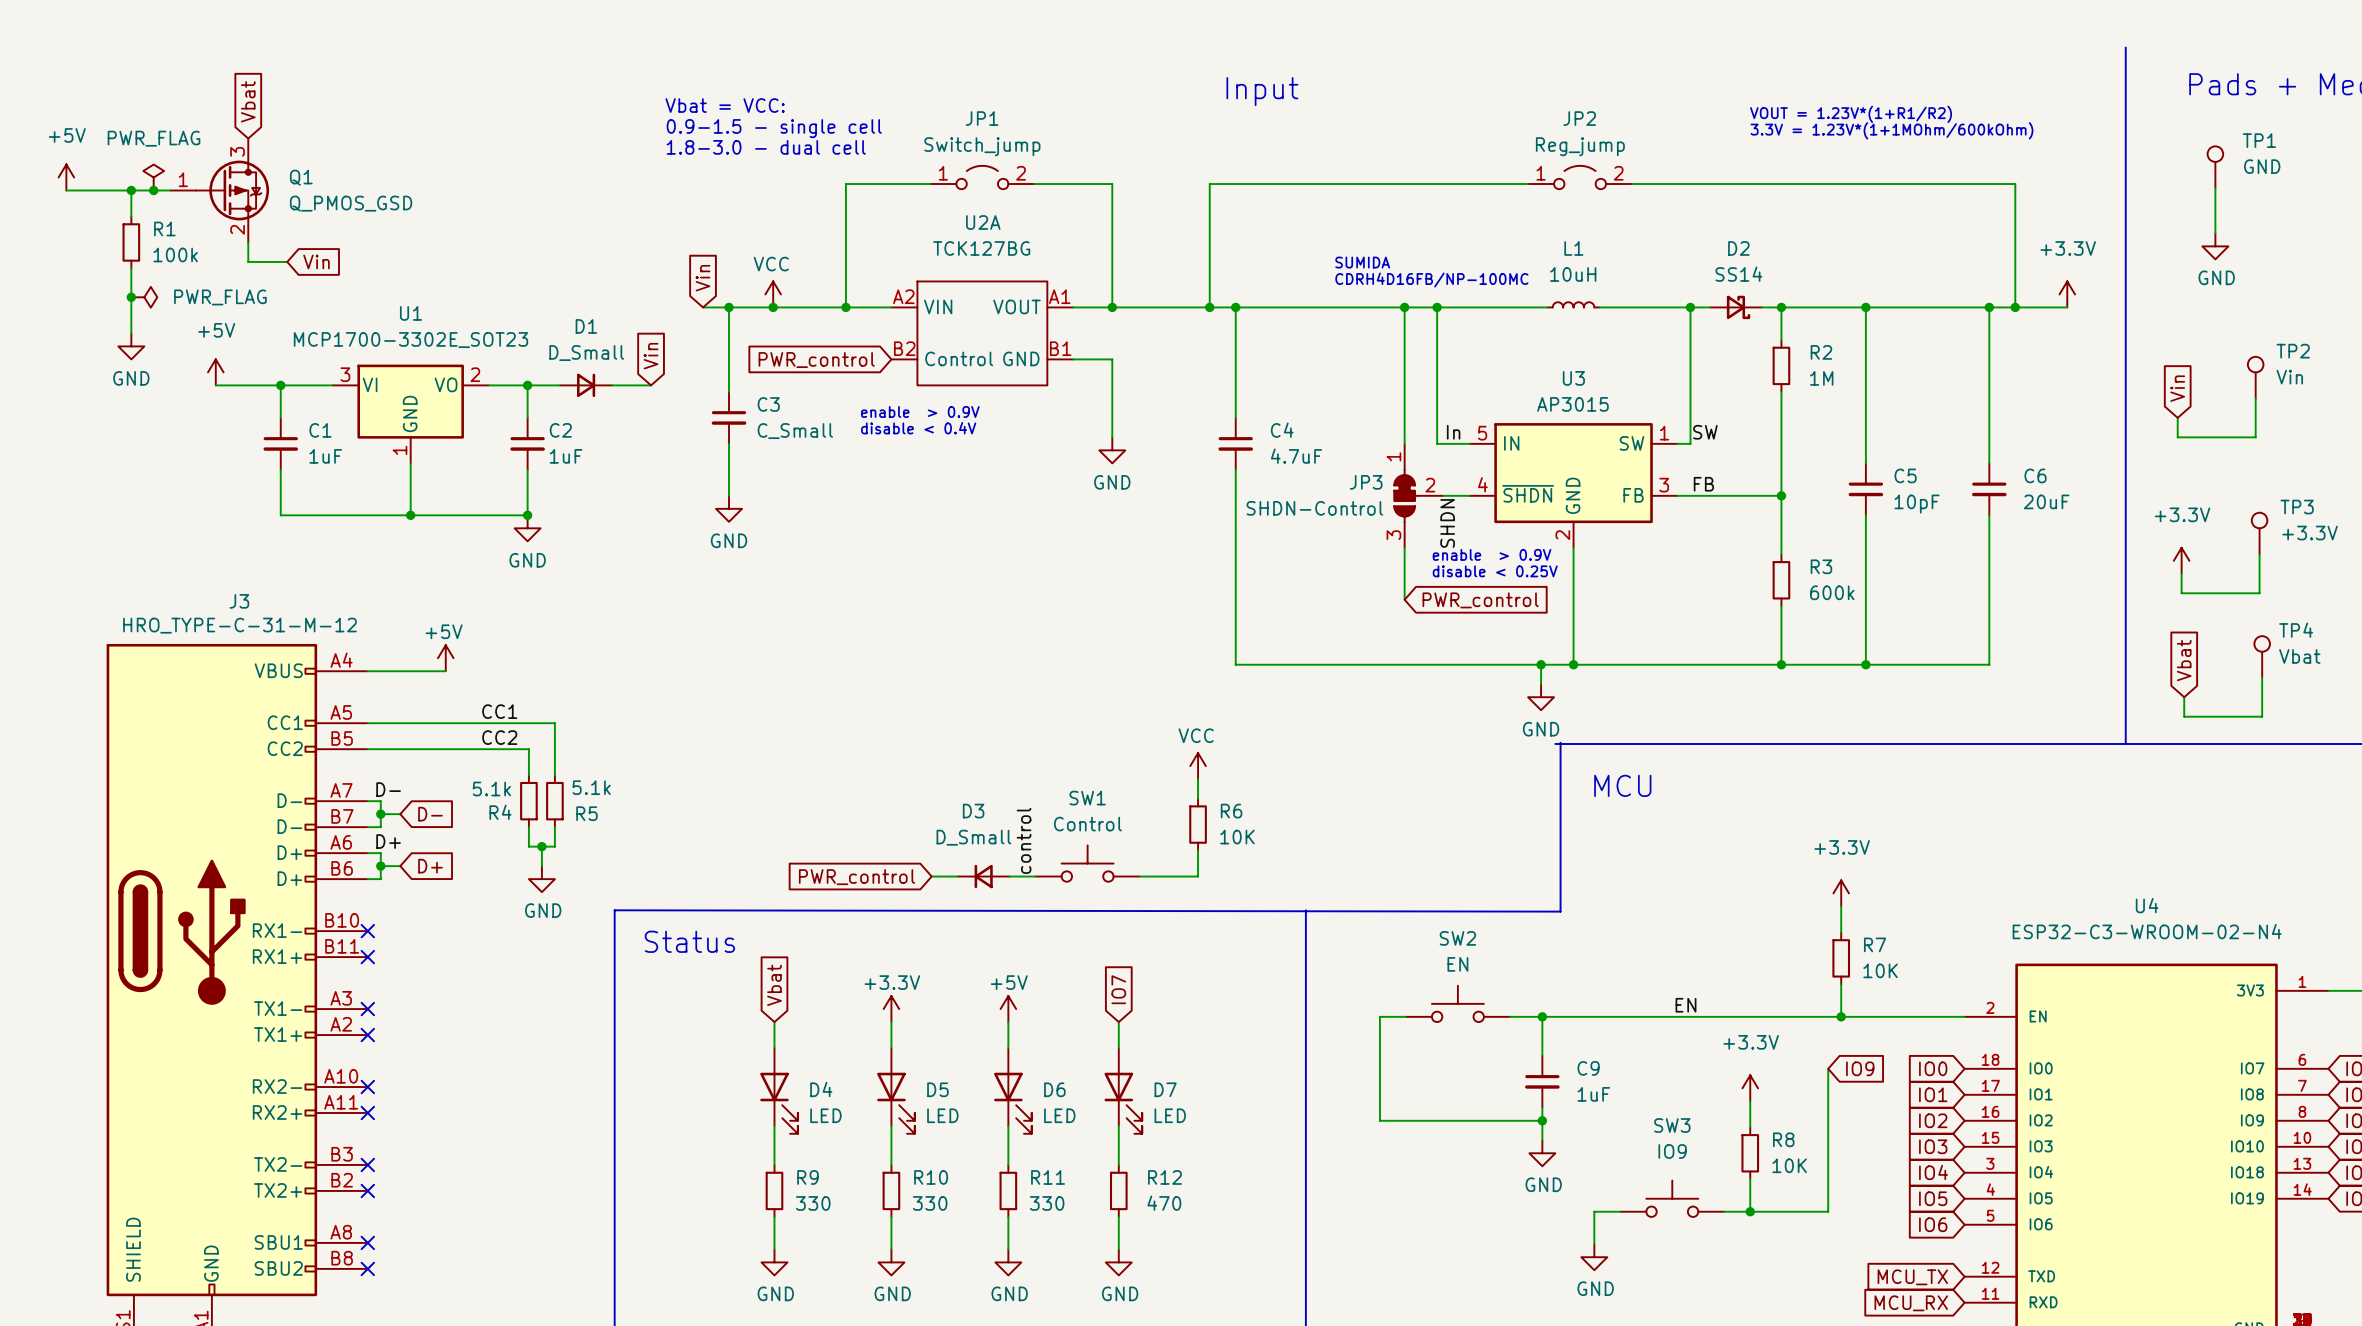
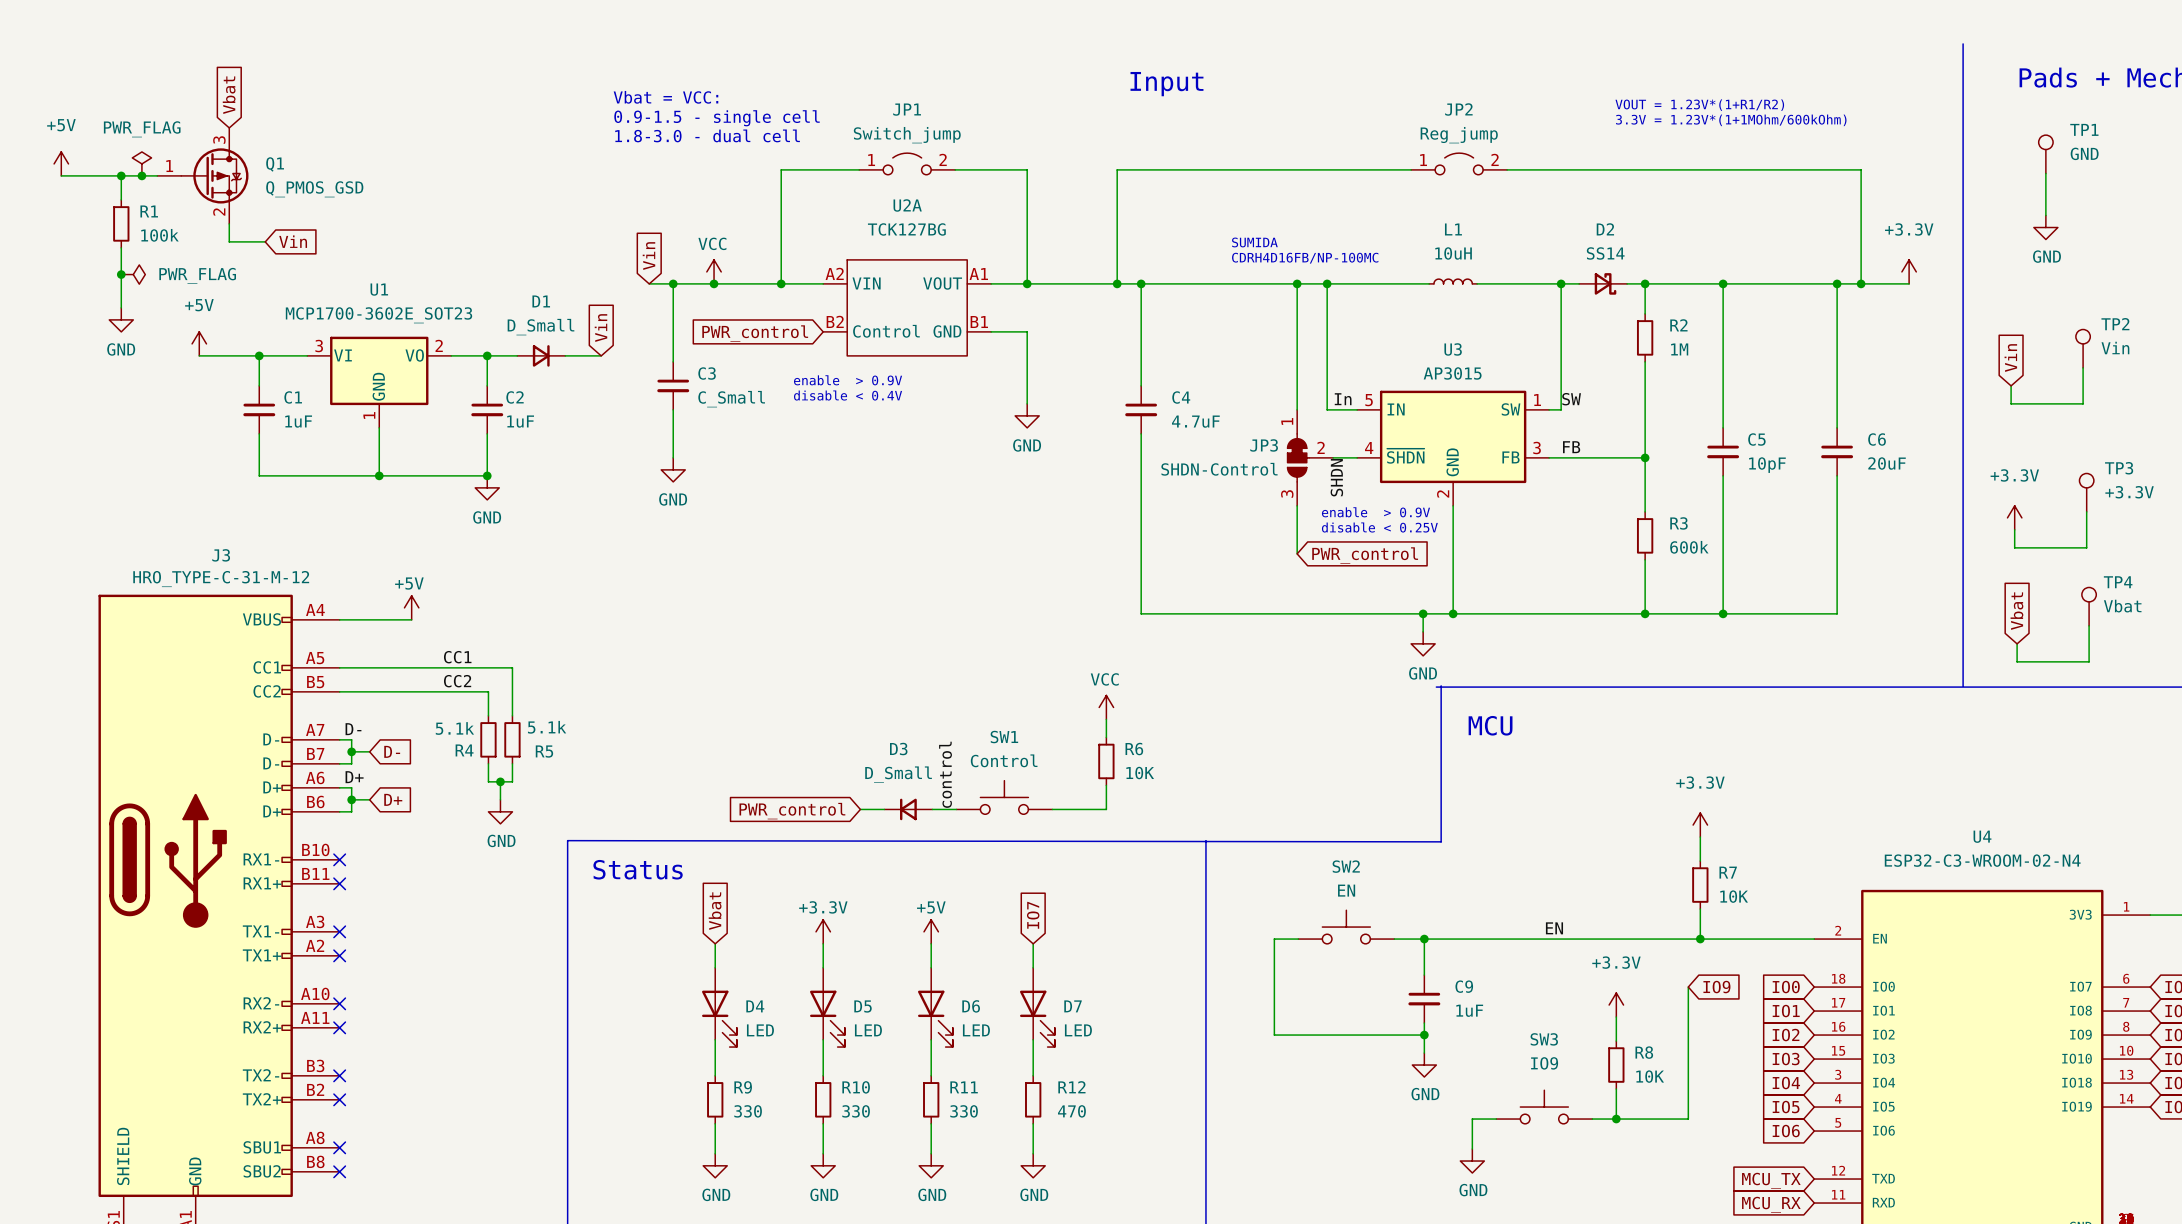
U1 value: MCP1700-3302E_SOT23 (410, 340) -> MCP1700-3602E_SOT23 (378, 315)

